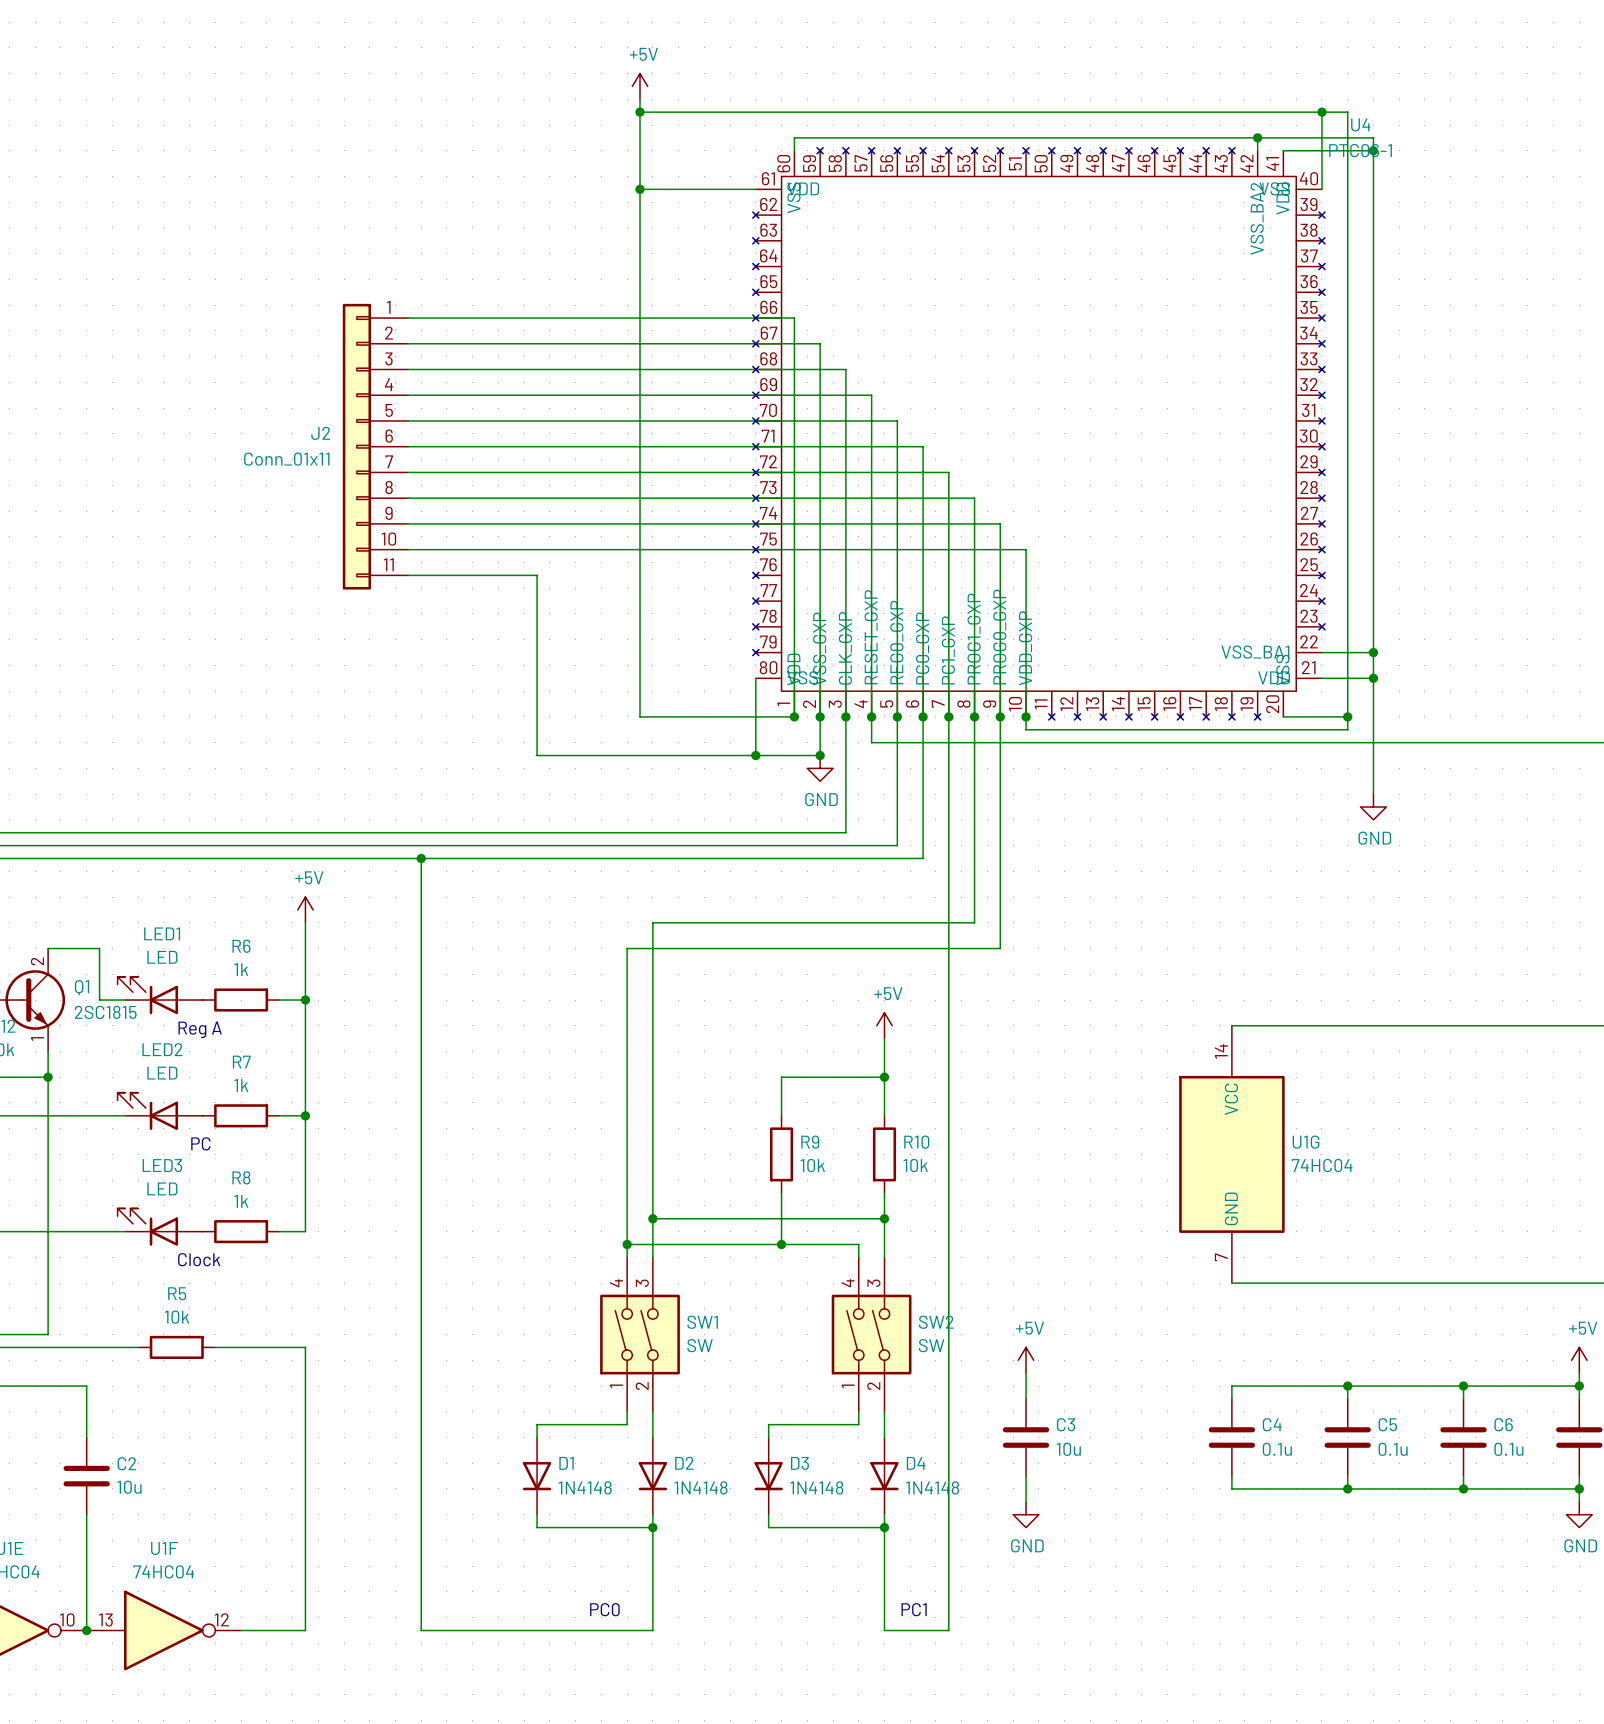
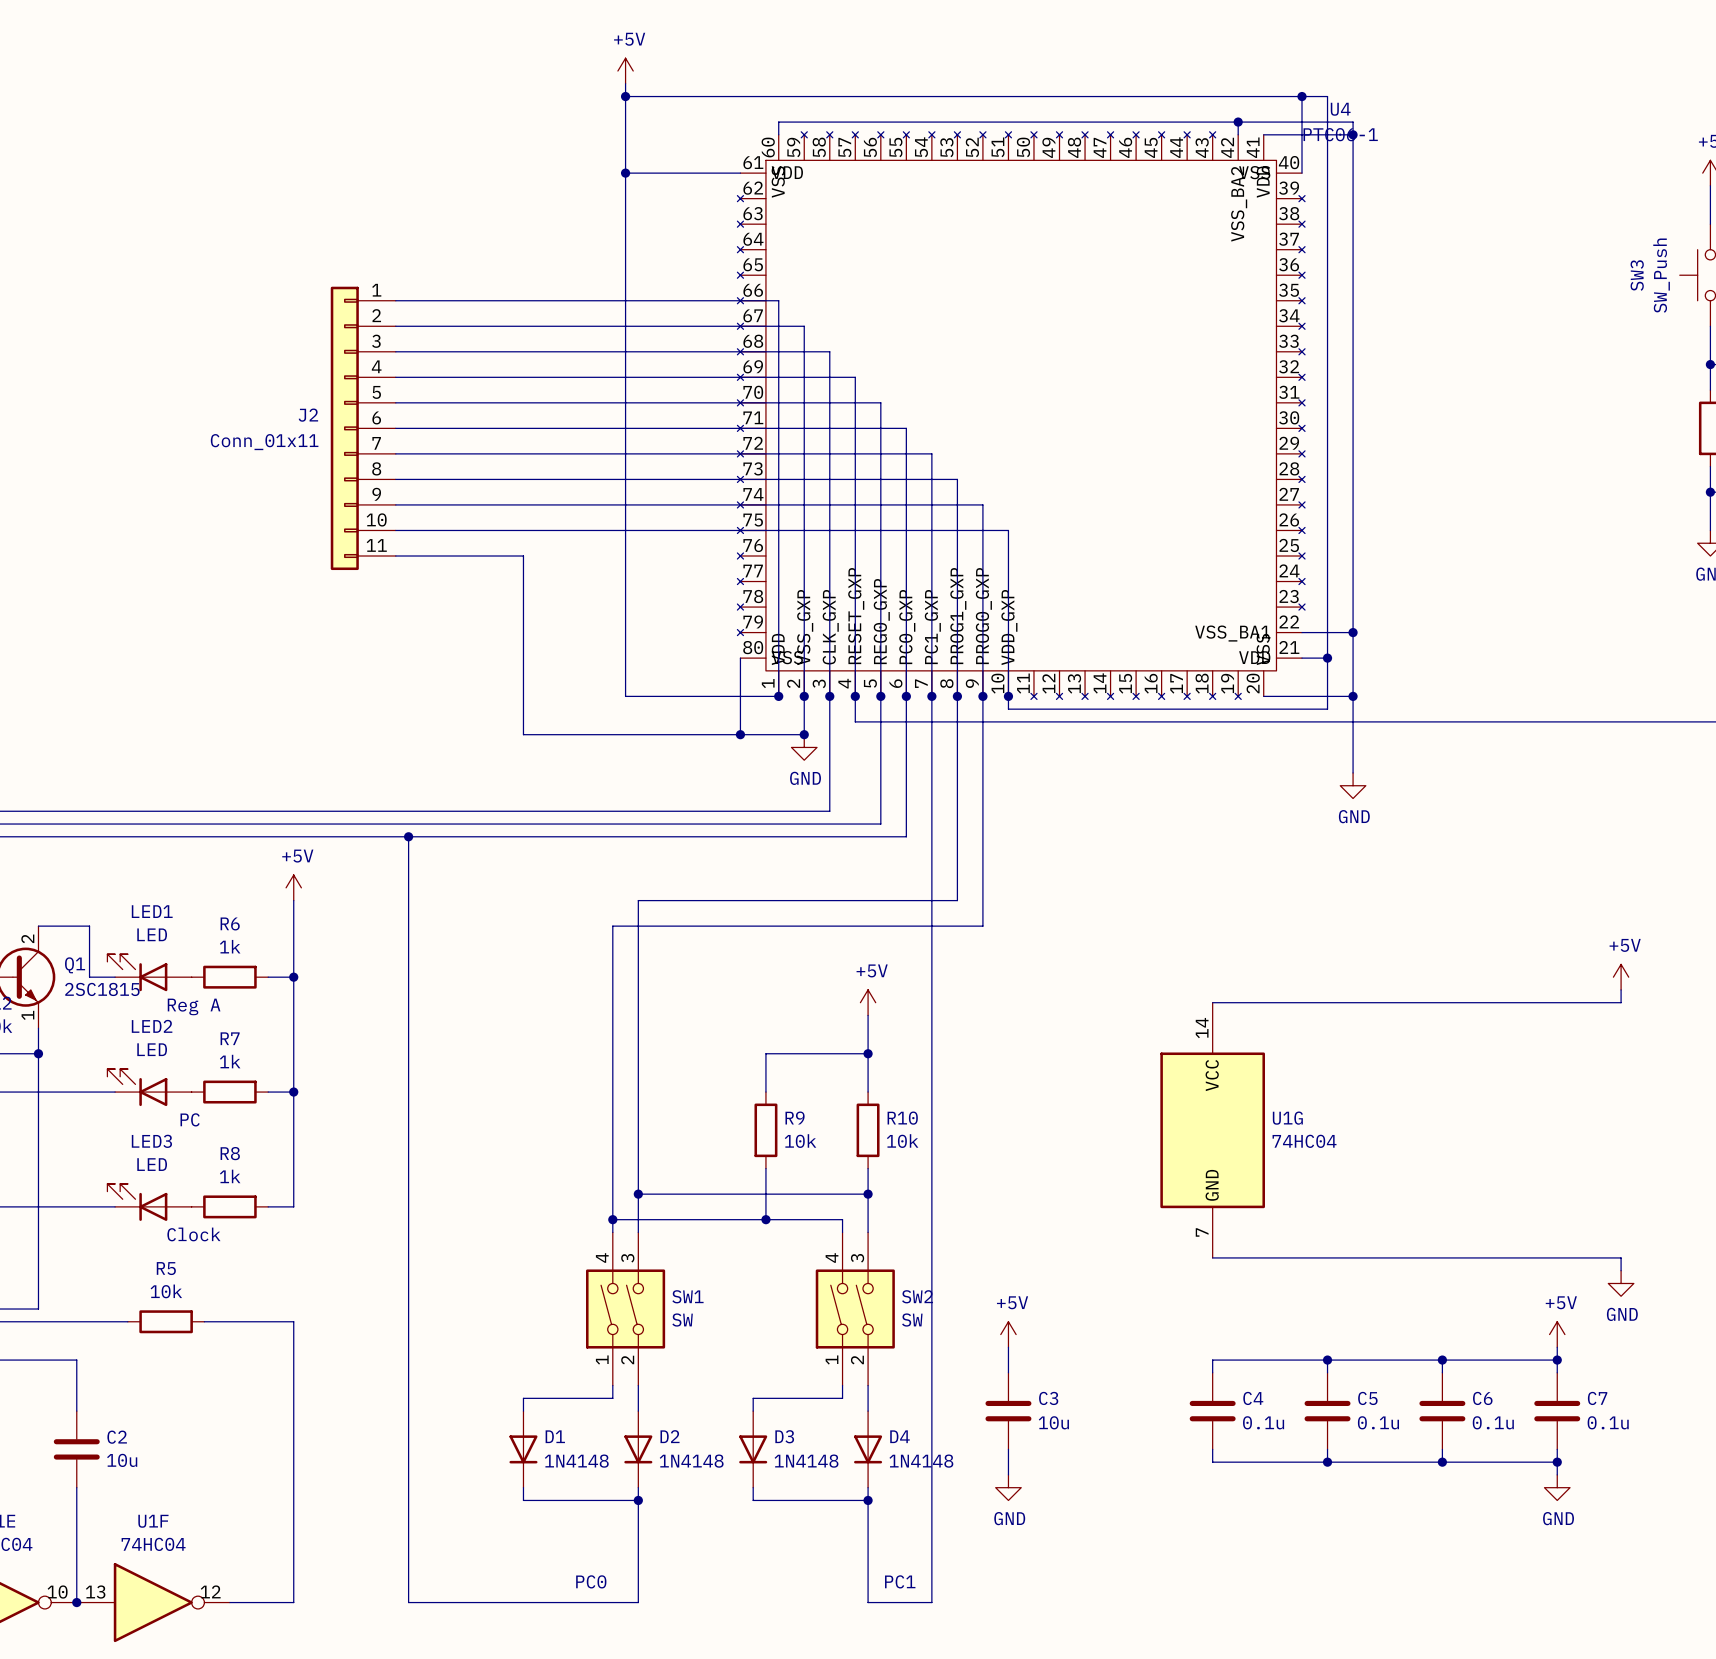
wire: (1347, 678) (1373, 678) -> (1327, 696) (1353, 696)
junction: none -> (1327, 658)
junction: (1373, 678) -> none
junction: (1347, 716) -> none
junction: none -> (1353, 696)

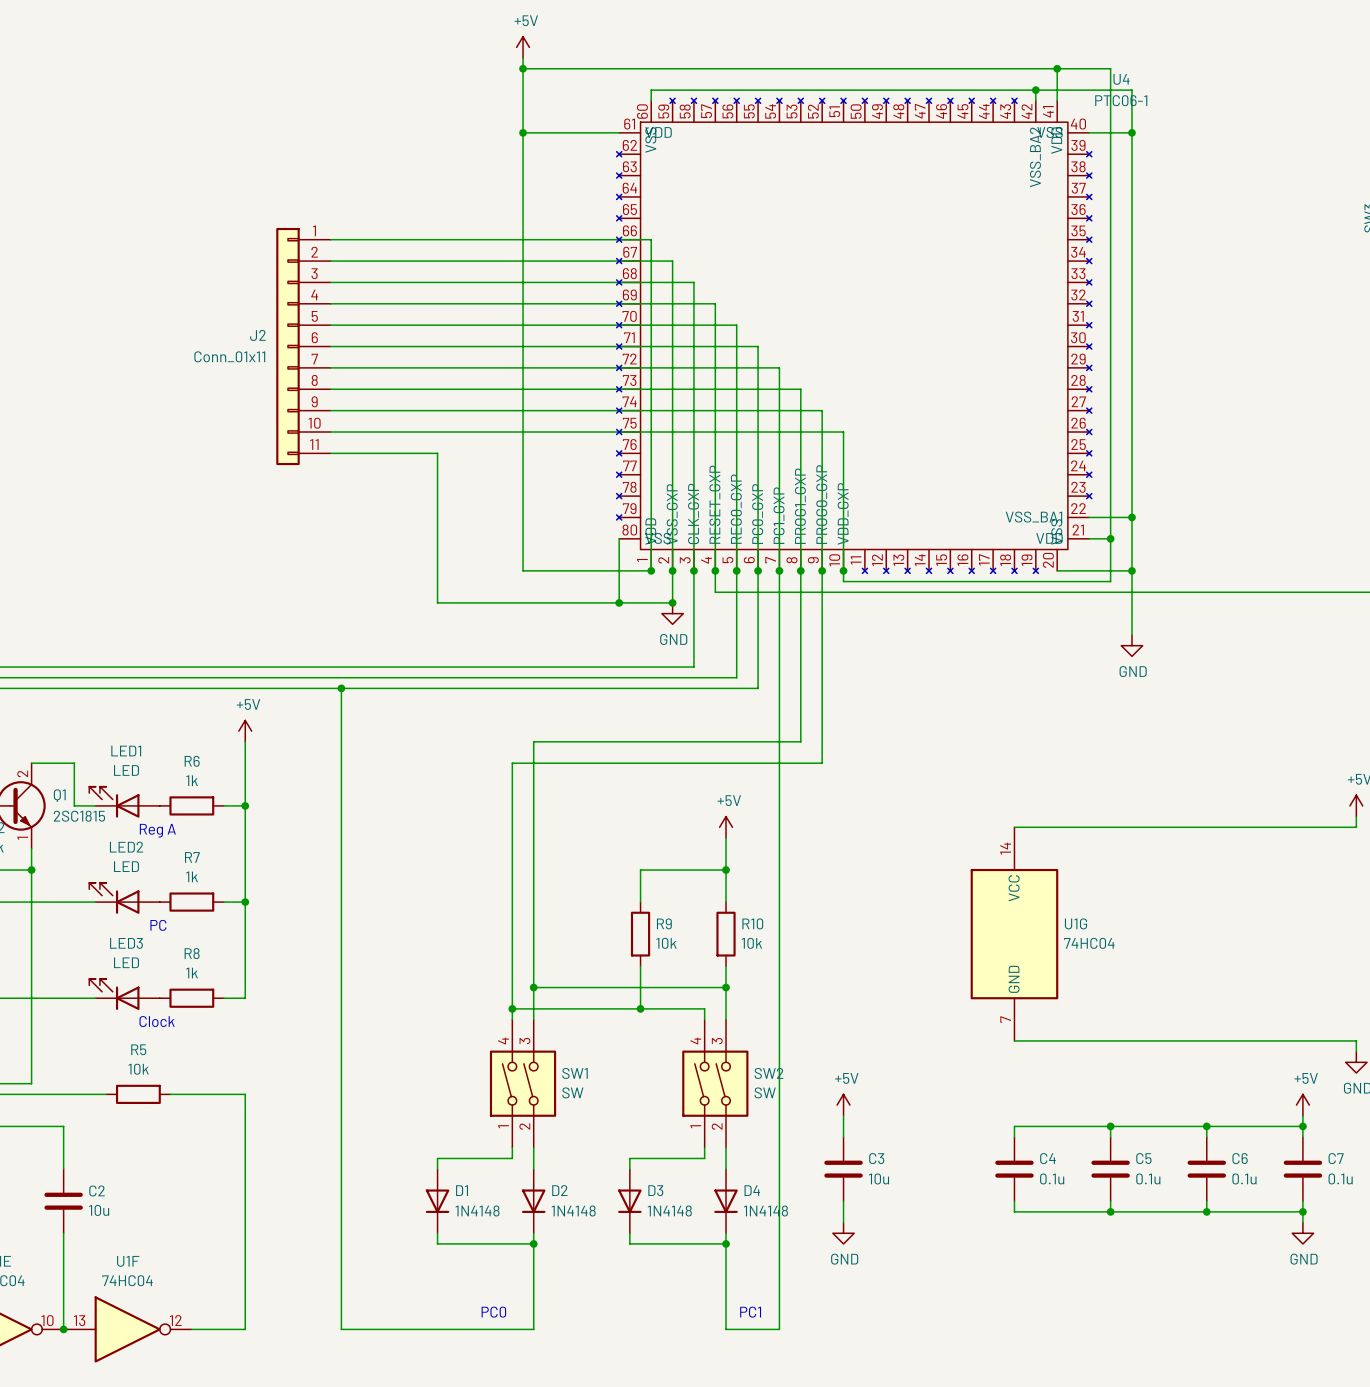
wire: (1302, 96) (1302, 173) -> (1131, 132) (1089, 132)
junction position: (1302, 96) -> (1057, 68)
wire: (1263, 134) (1353, 134) -> (1057, 100) (1057, 68)
junction position: (1353, 134) -> (1131, 132)

